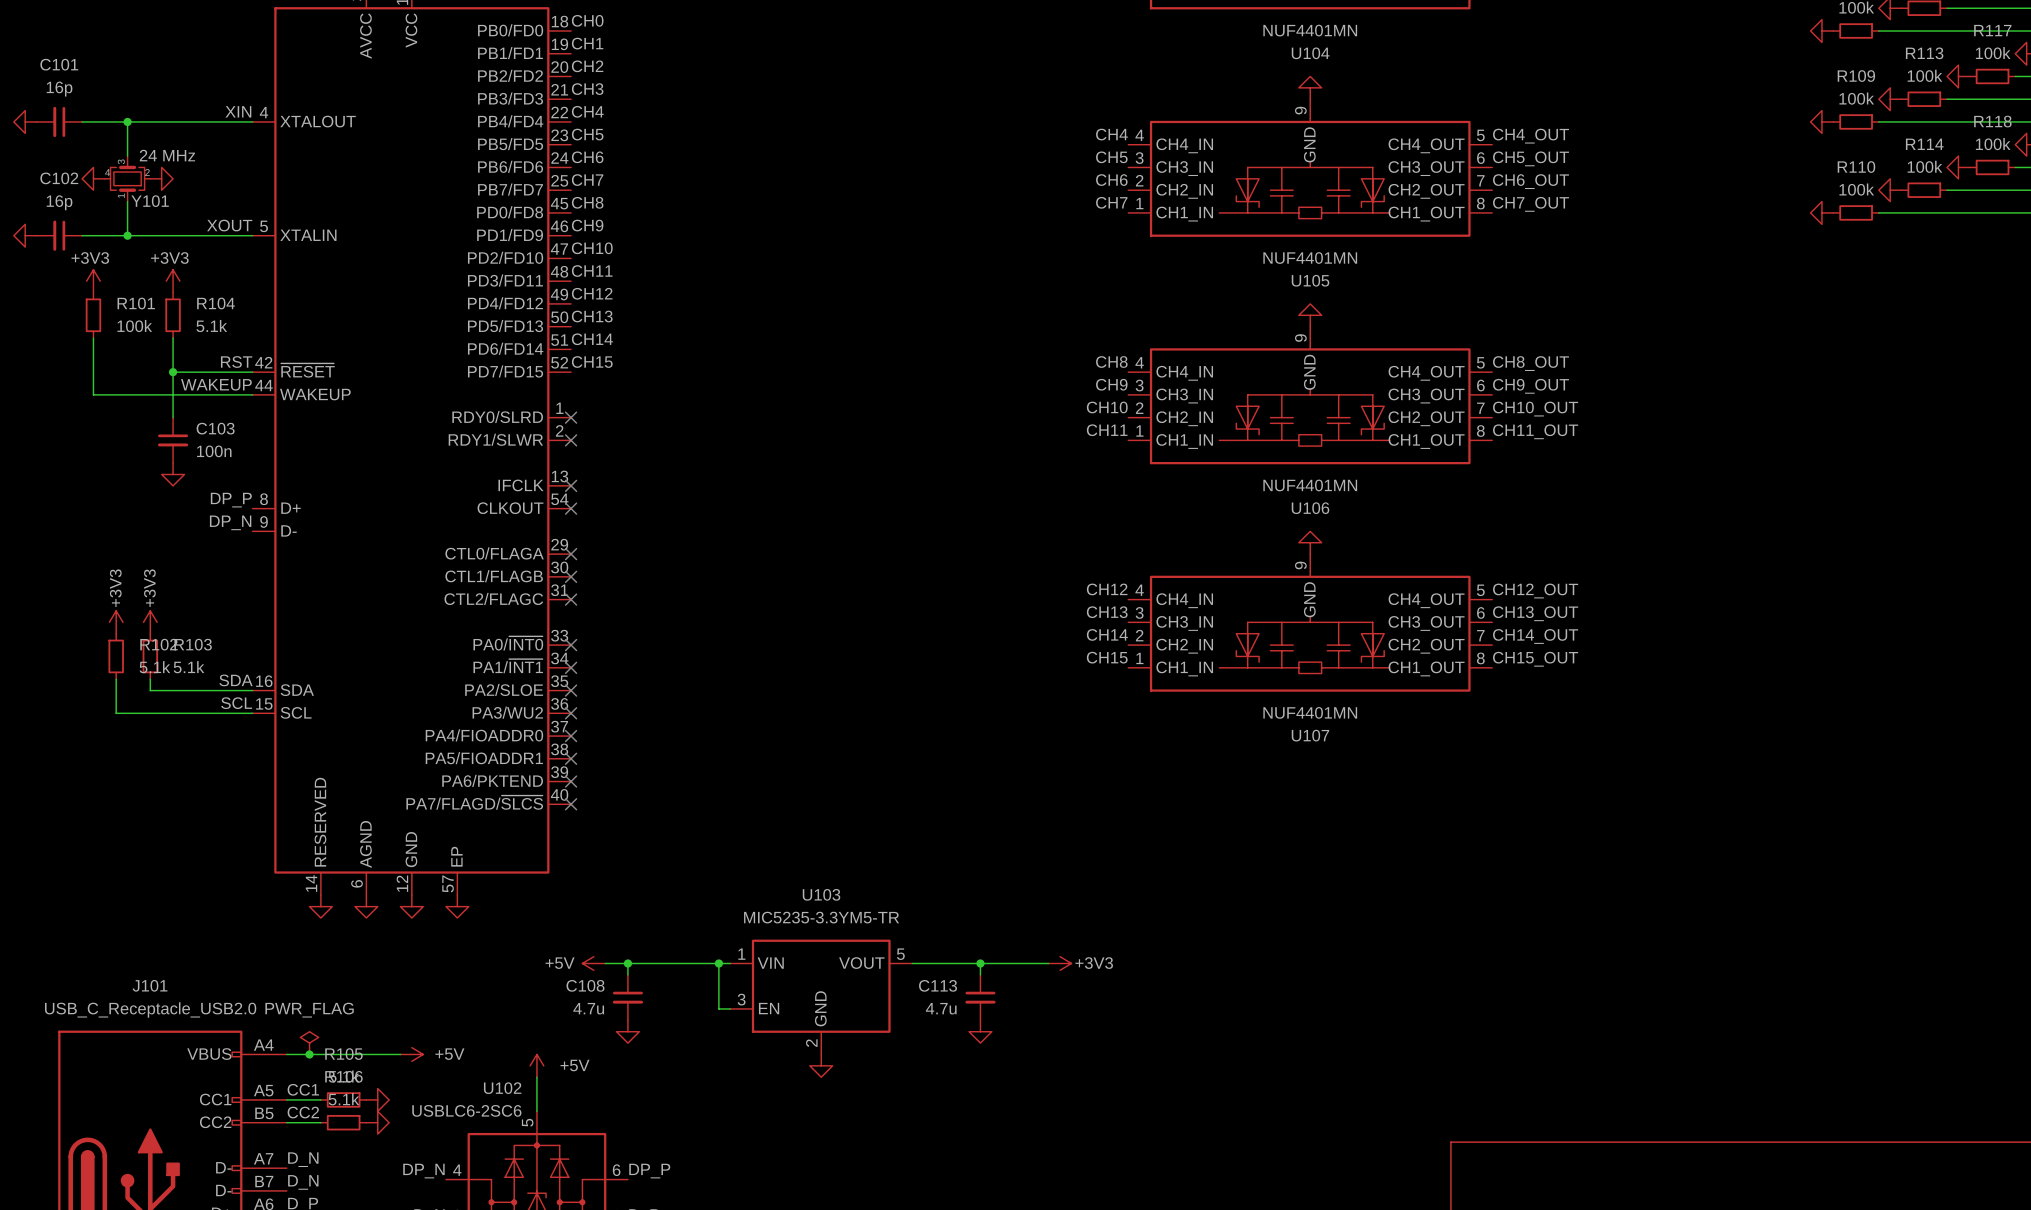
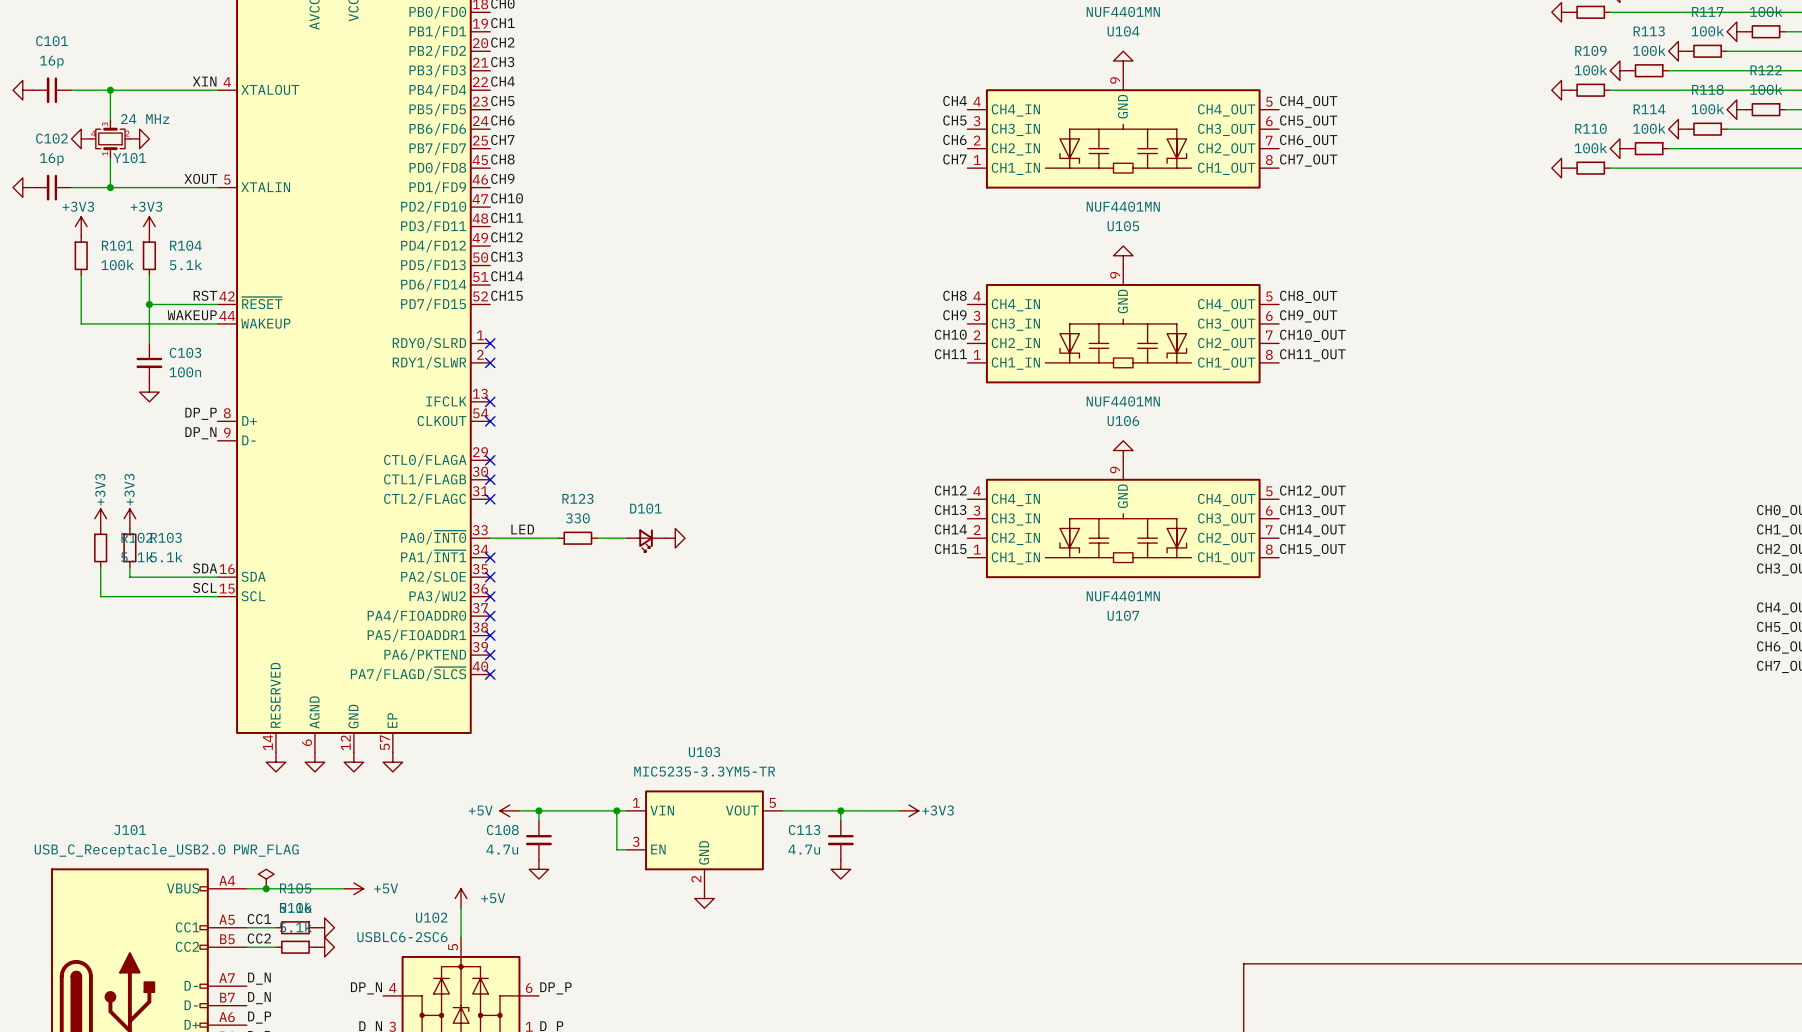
label: none -> LED (522, 529)
wire: none -> (490, 538) (558, 538)
no-connect mark: (571, 645) -> none
R123: none -> 330 (577, 538)
wire: none -> (597, 538) (626, 538)
power symbol: none -> (675, 538)
D101: none -> (646, 540)

